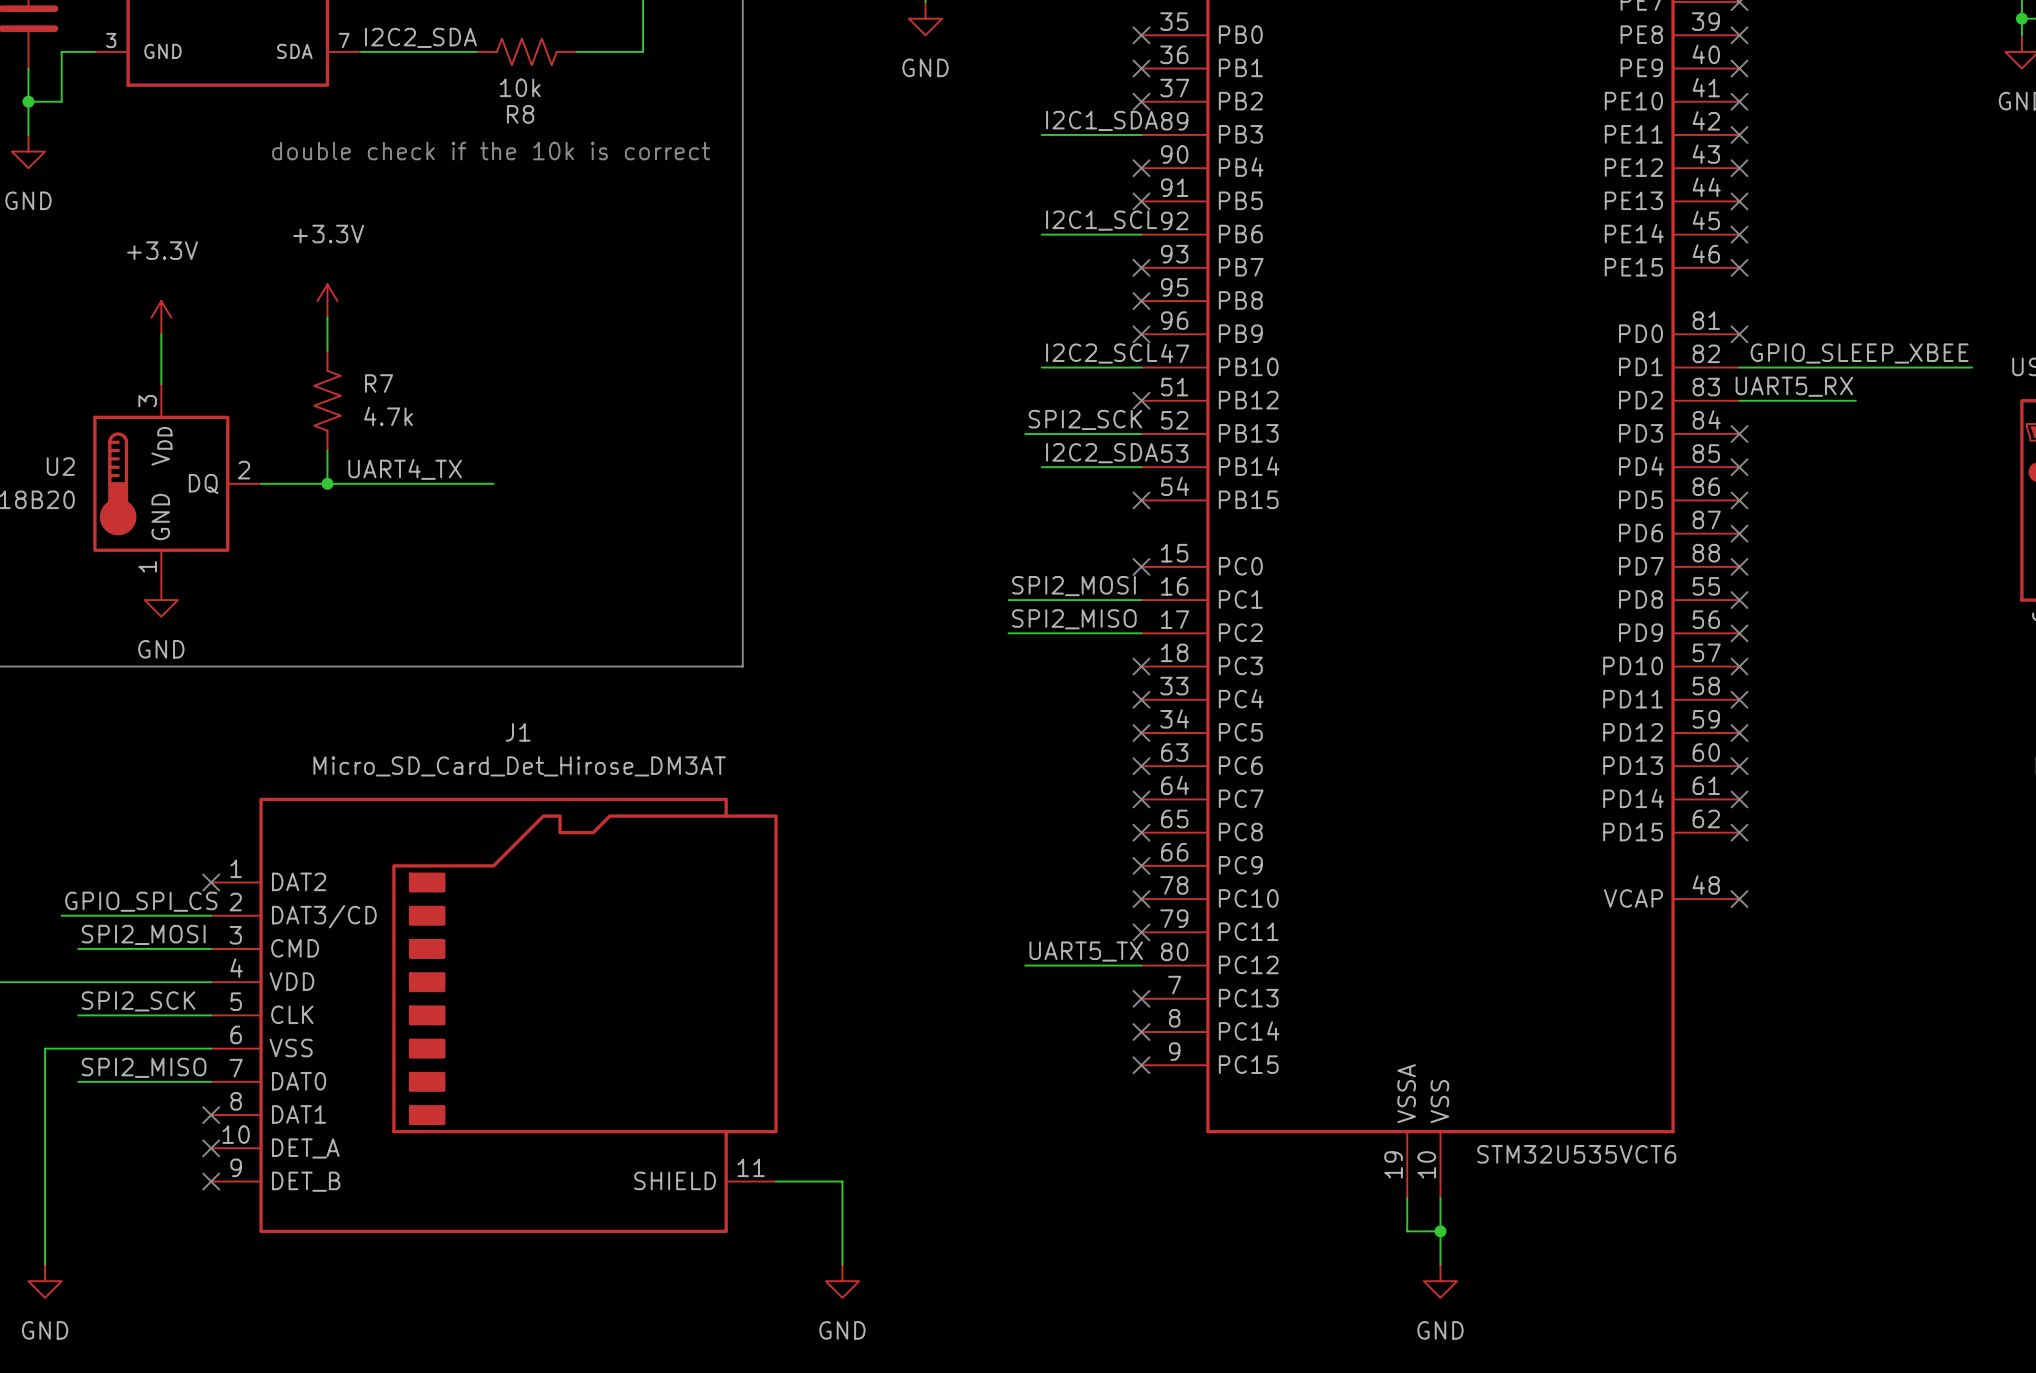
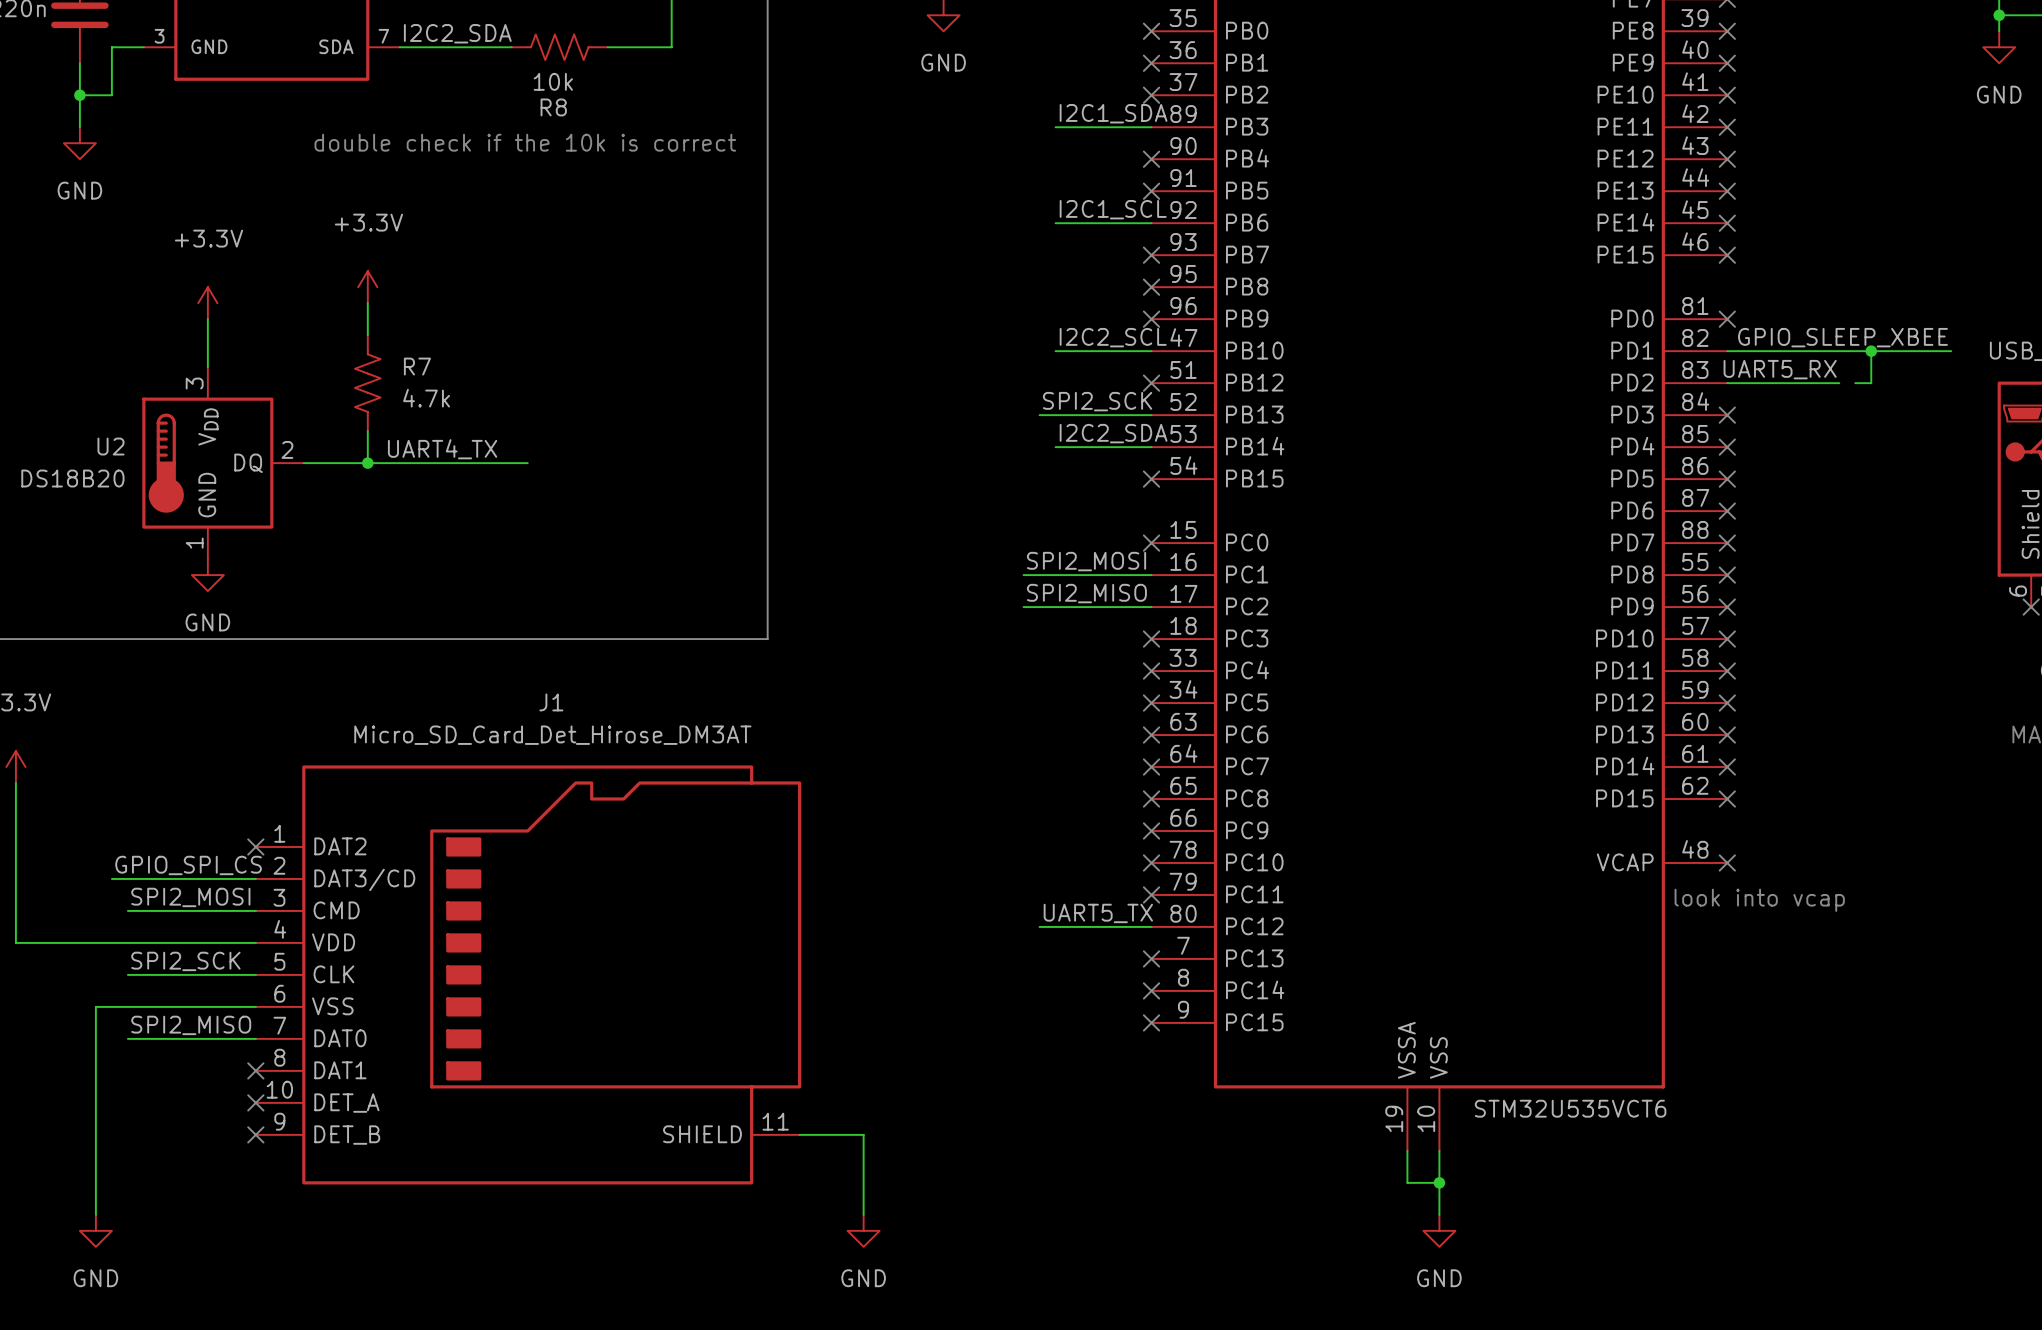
wire: none -> (1871, 351) (1871, 383) (1855, 383)
junction: none -> (1871, 351)
text: none -> look into vcap (1759, 900)

